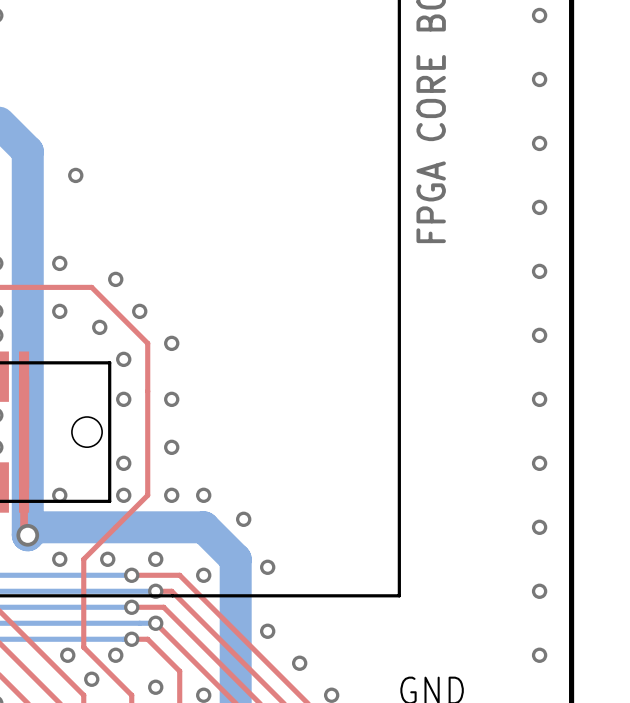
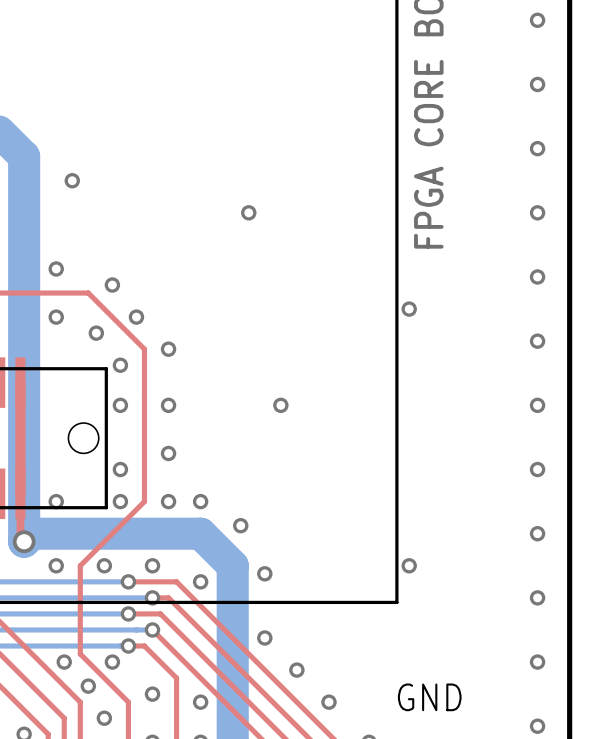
via: none -> (248, 212)
via: none -> (409, 309)
via: none -> (280, 405)
via: none -> (409, 565)

